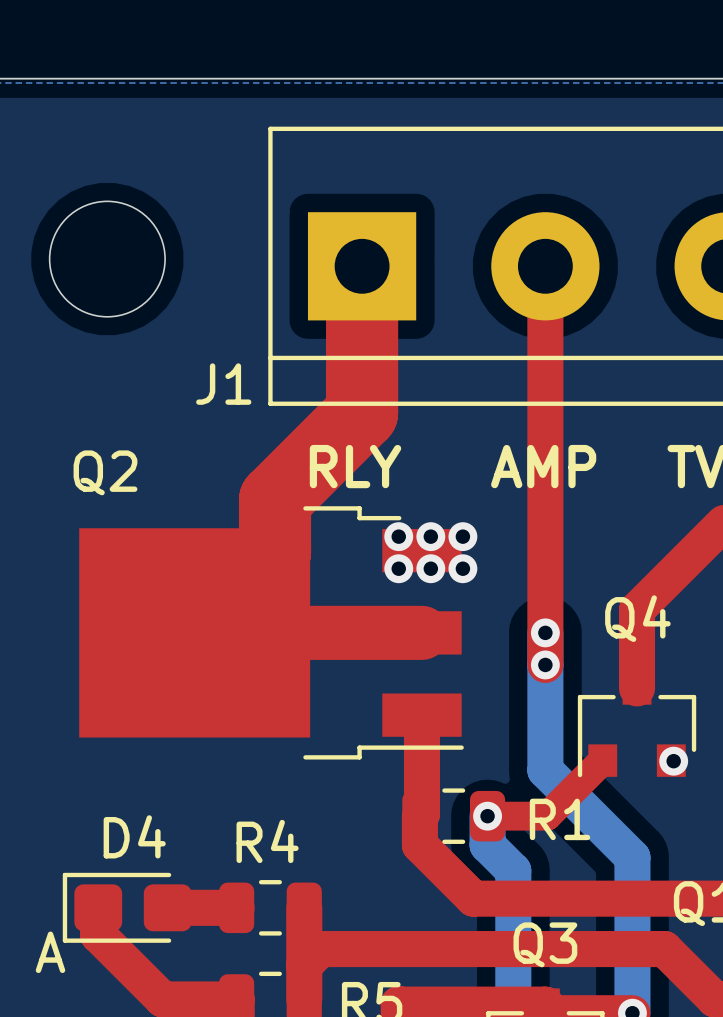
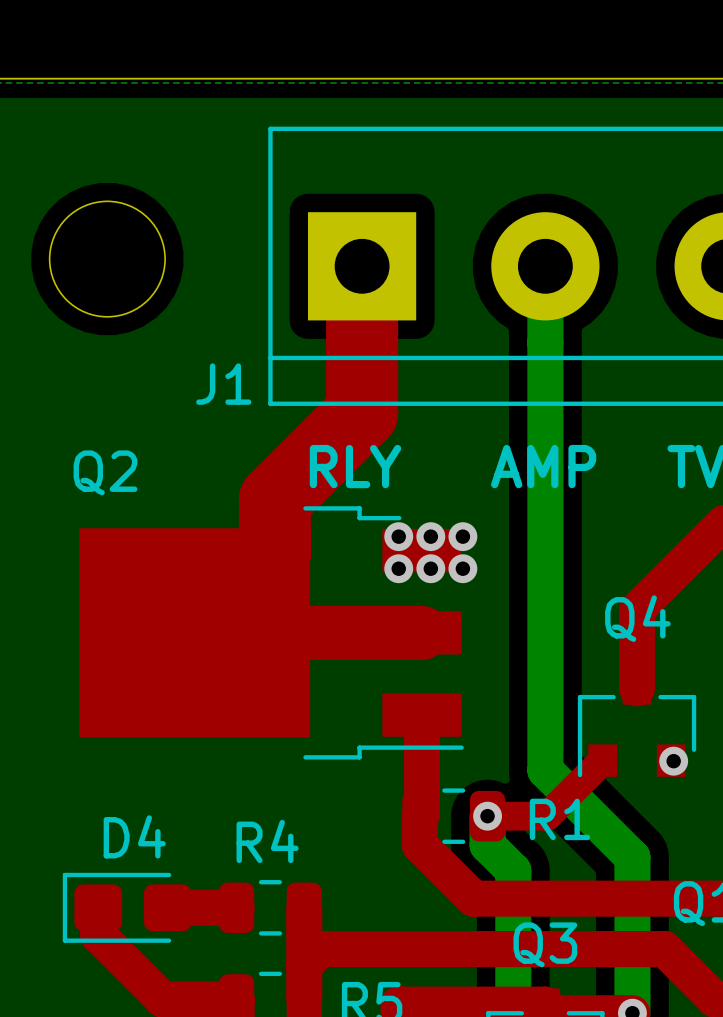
top track: (545, 266) (545, 664) -> none
bottom track: none -> (545, 266) (545, 632)
via: (545, 632) -> none
via: (545, 664) -> none
text: A (50, 952) -> none

